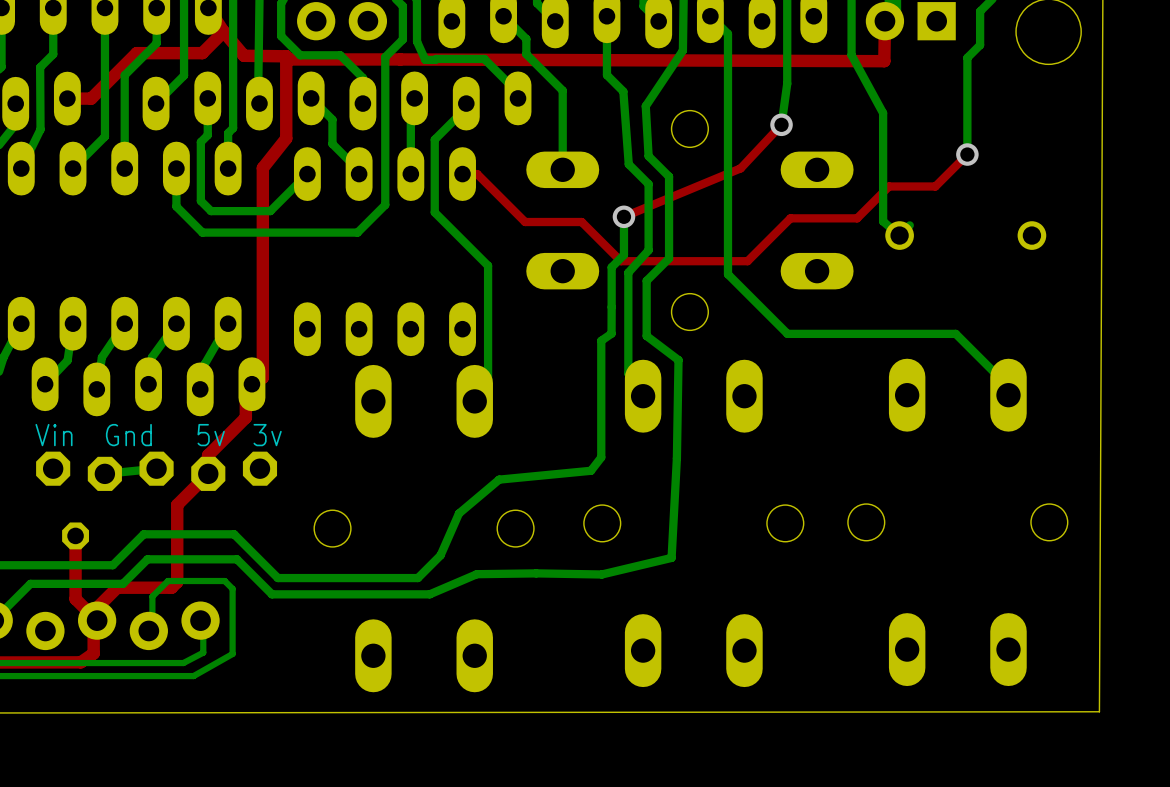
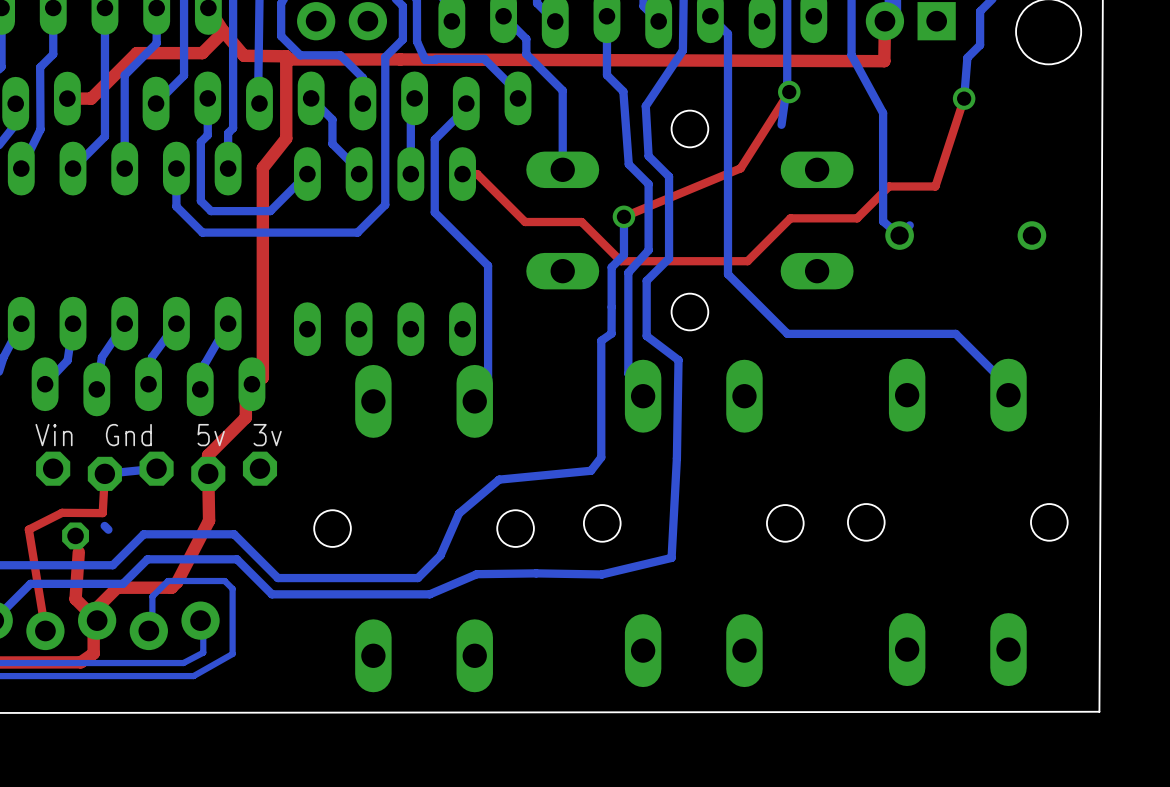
bottom track: (967, 57) (967, 154) -> (967, 57) (964, 98)
top track: (781, 124) (740, 168) -> (789, 92) (740, 168)
via position: (781, 124) -> (789, 92)
top track: (967, 154) (935, 186) -> (964, 98) (935, 186)
via position: (967, 154) -> (964, 98)
top track: none -> (104, 473) (102, 513) (62, 512) (28, 529) (45, 630)
top track: (208, 473) (177, 504) (177, 582) -> (208, 473) (209, 520) (177, 582)
bottom track: none -> (104, 525) (108, 529)
top track: (75, 535) (75, 599) -> (78, 552) (75, 599)

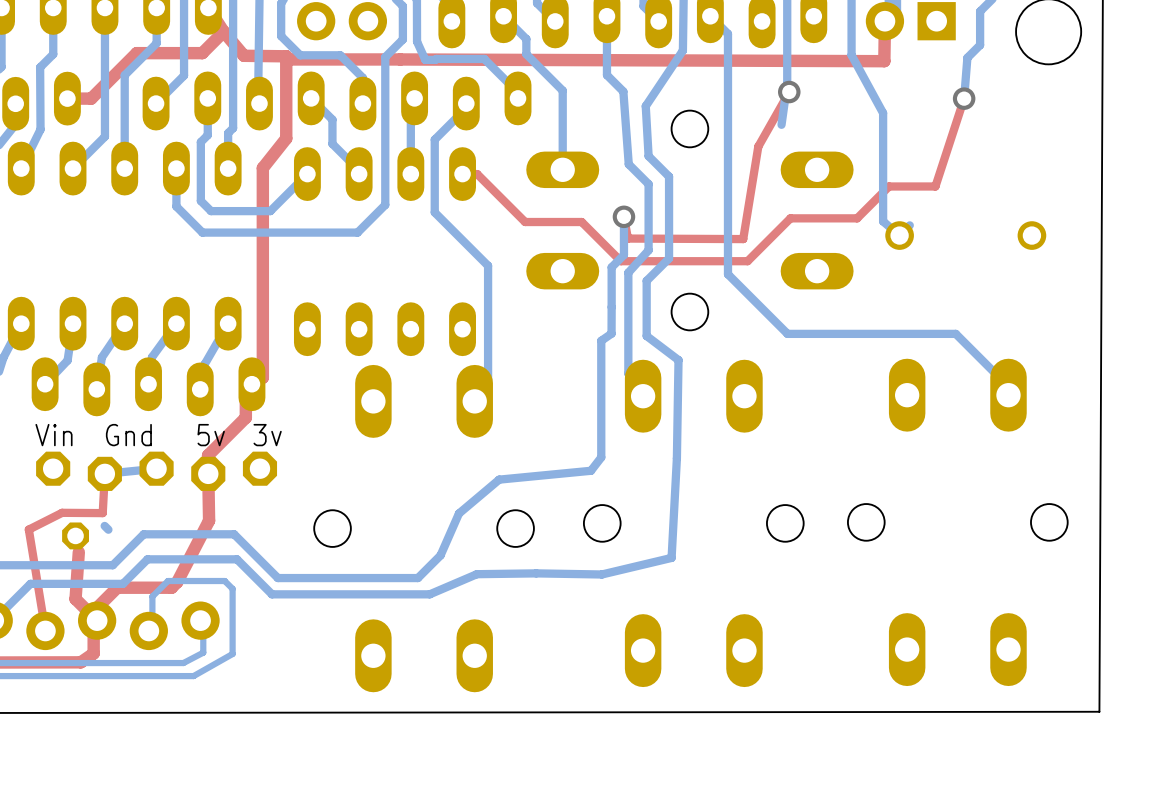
top track: (789, 92) (740, 168) (623, 216) -> (789, 92) (758, 146) (743, 239) (627, 238) (623, 216)

